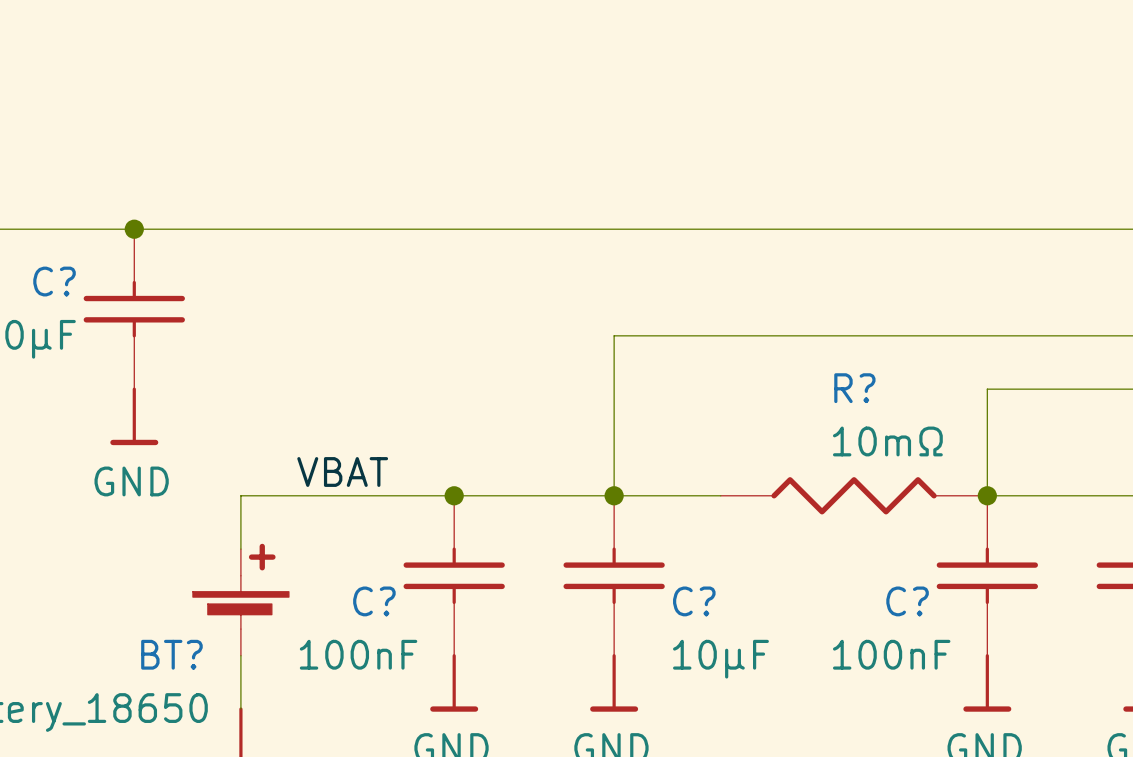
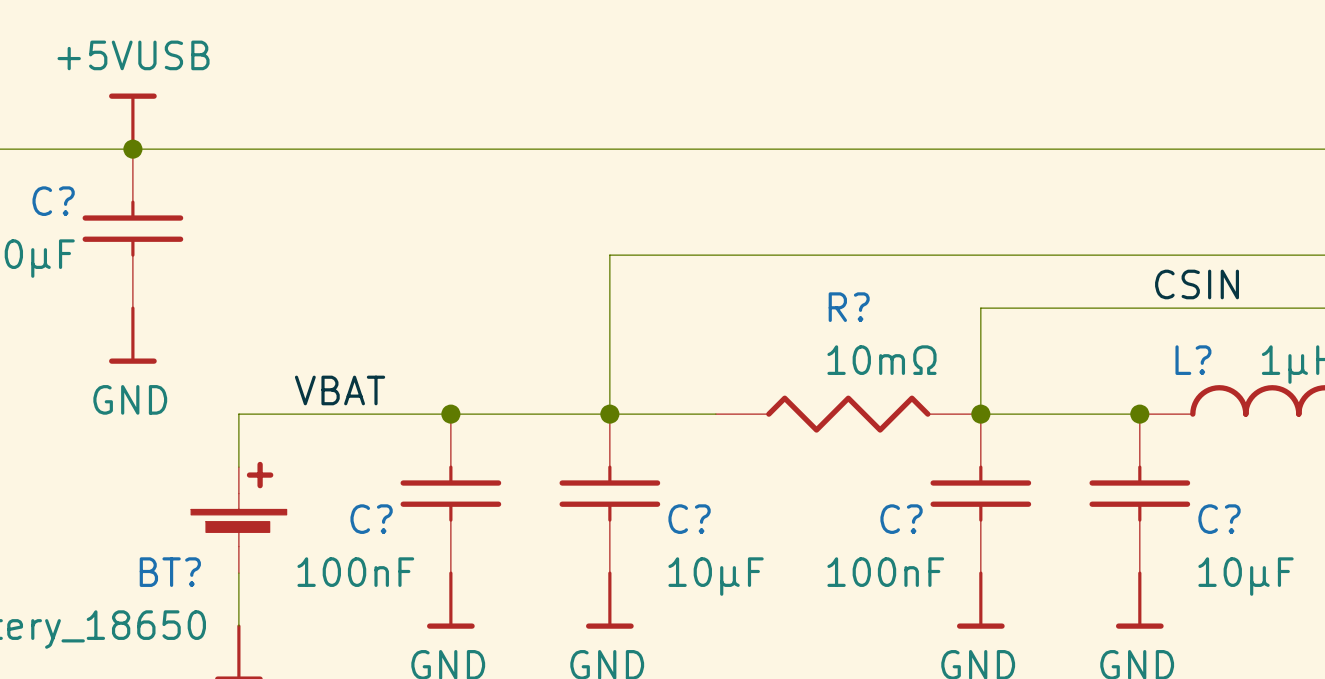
power symbol: none -> +5VUSB (132, 122)

